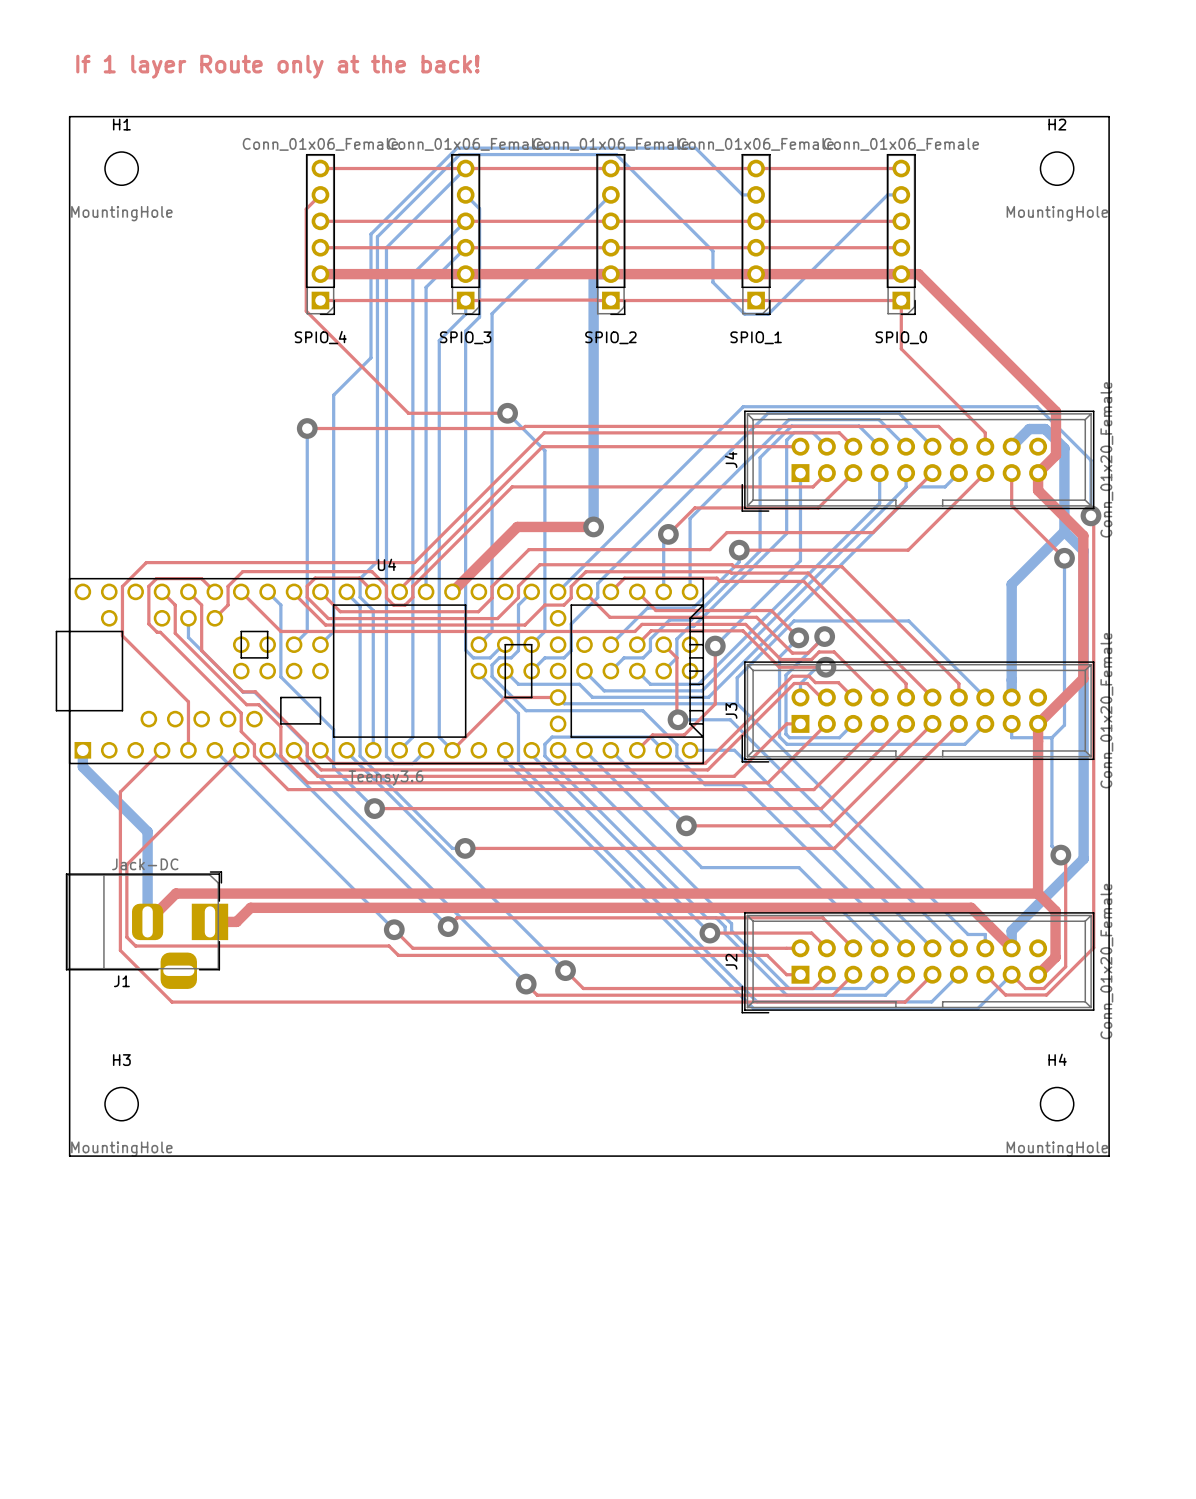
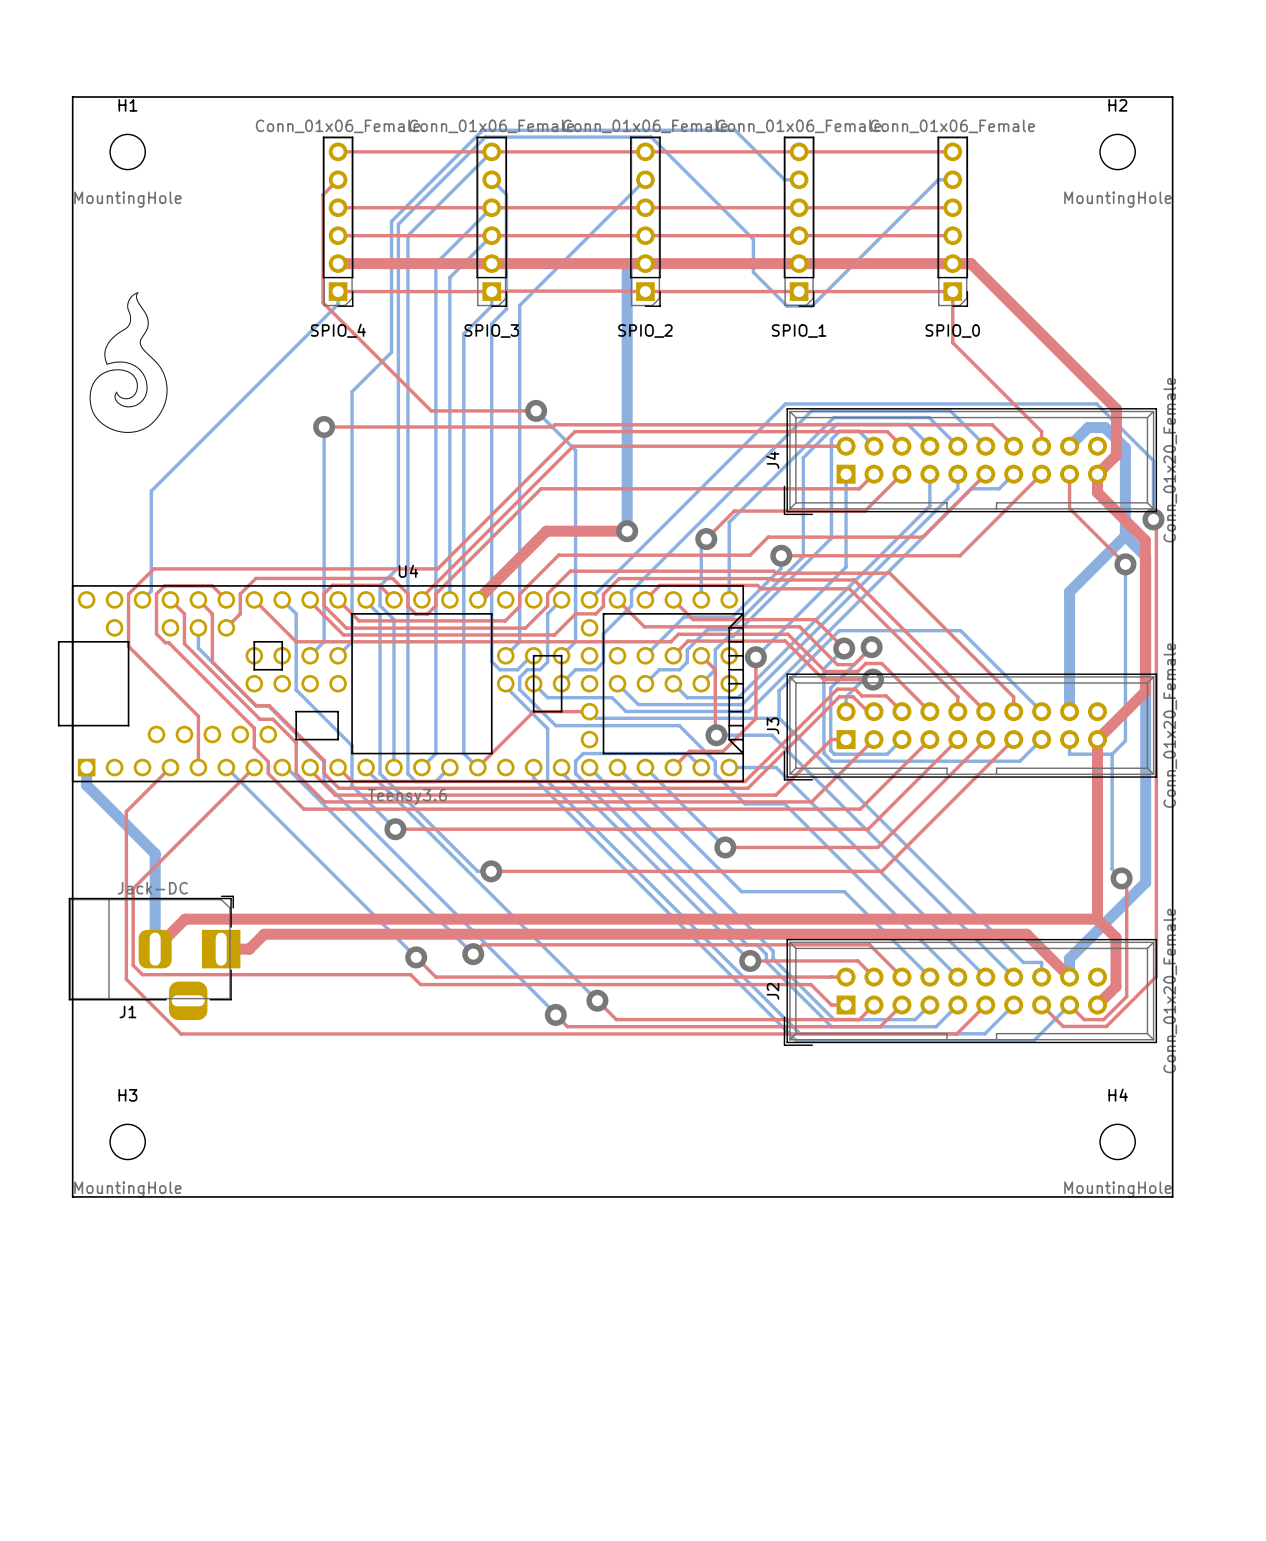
text: If 1 layer Route only at the back! (277, 66) -> none
drawing: none -> [89, 291, 168, 433]
bottom track: none -> (338, 291) (338, 304) (151, 491) (151, 591) (142, 599)

